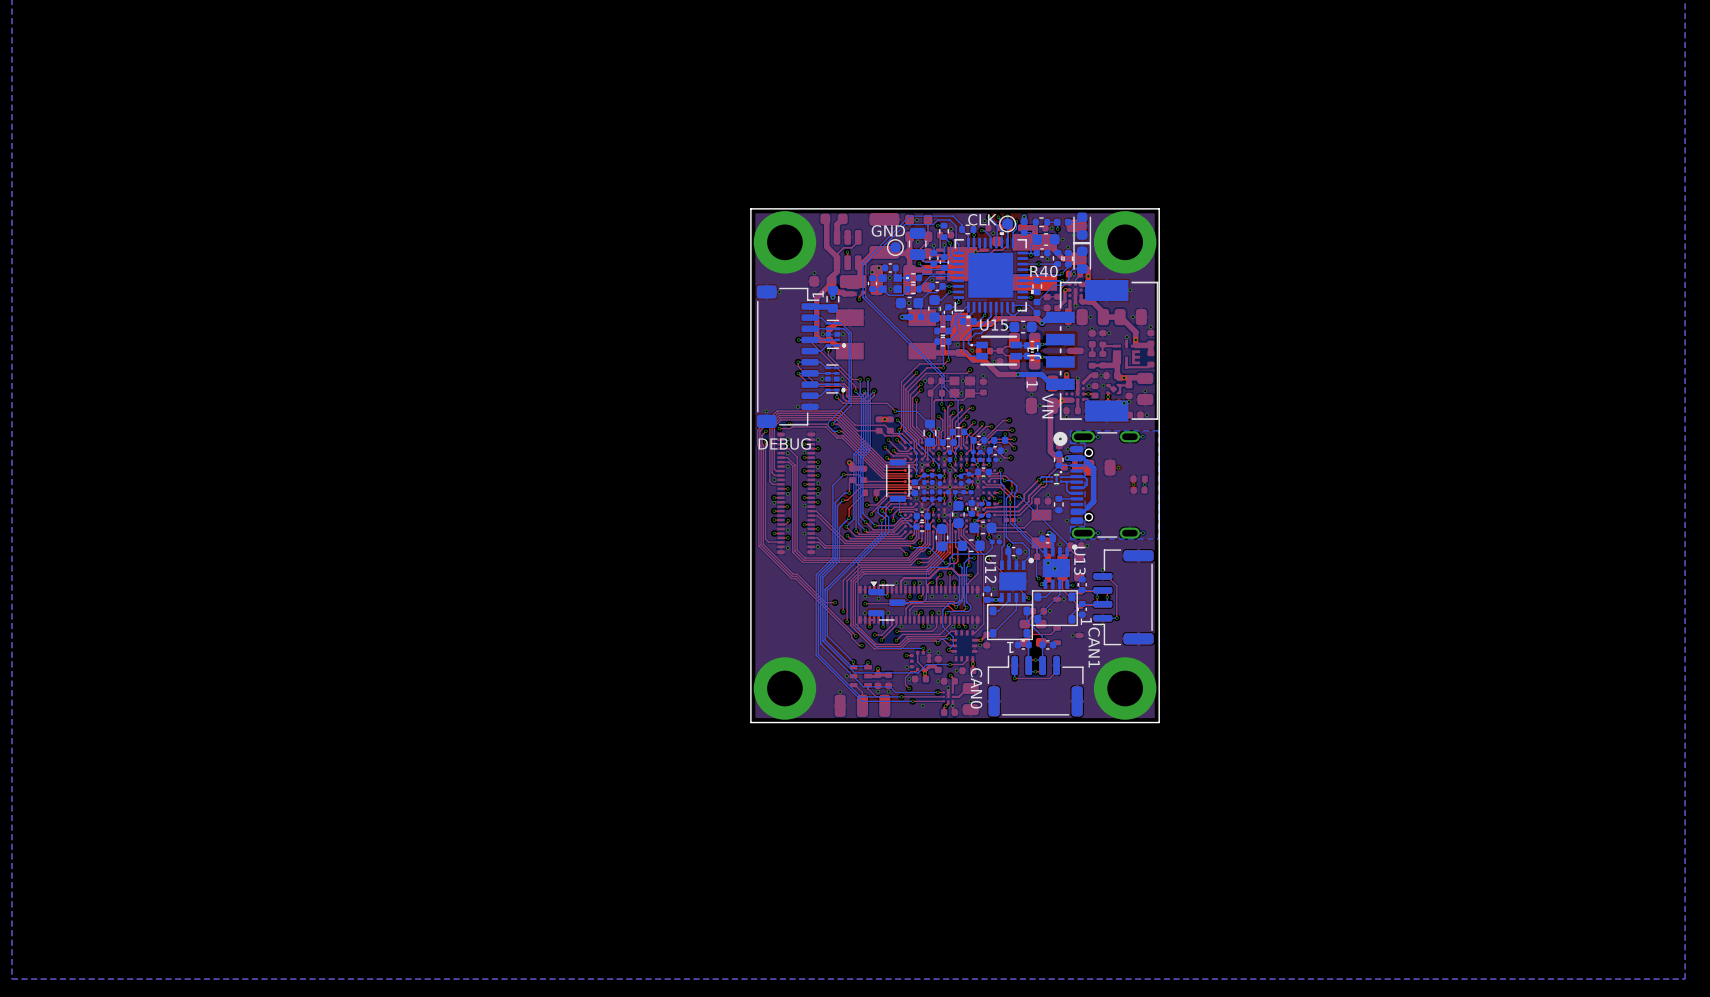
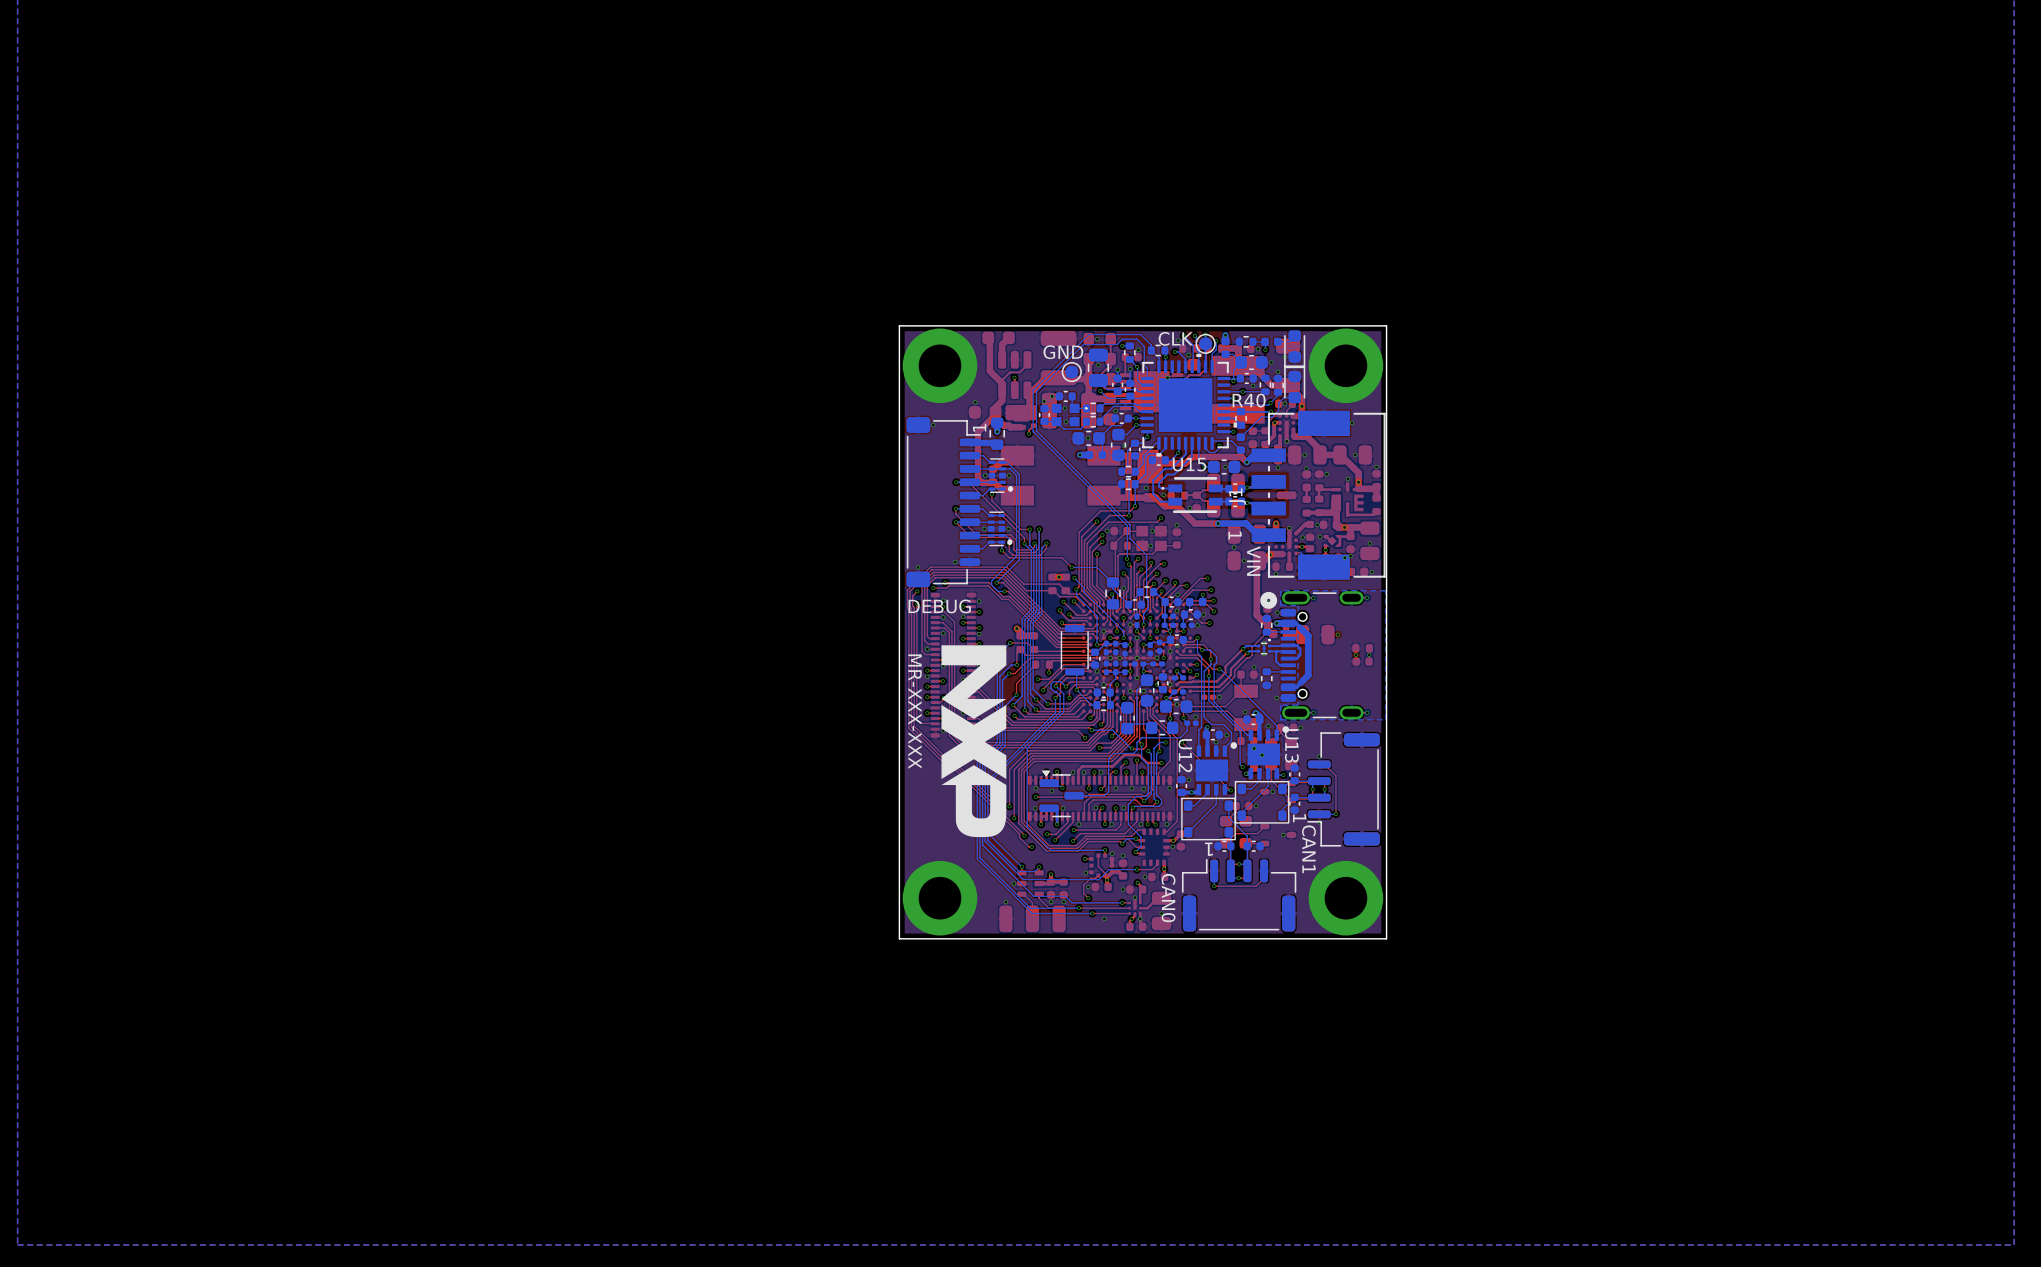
drawing: none -> [941, 645, 1007, 838]
text: none -> MR-XXX-XXX (915, 711)

